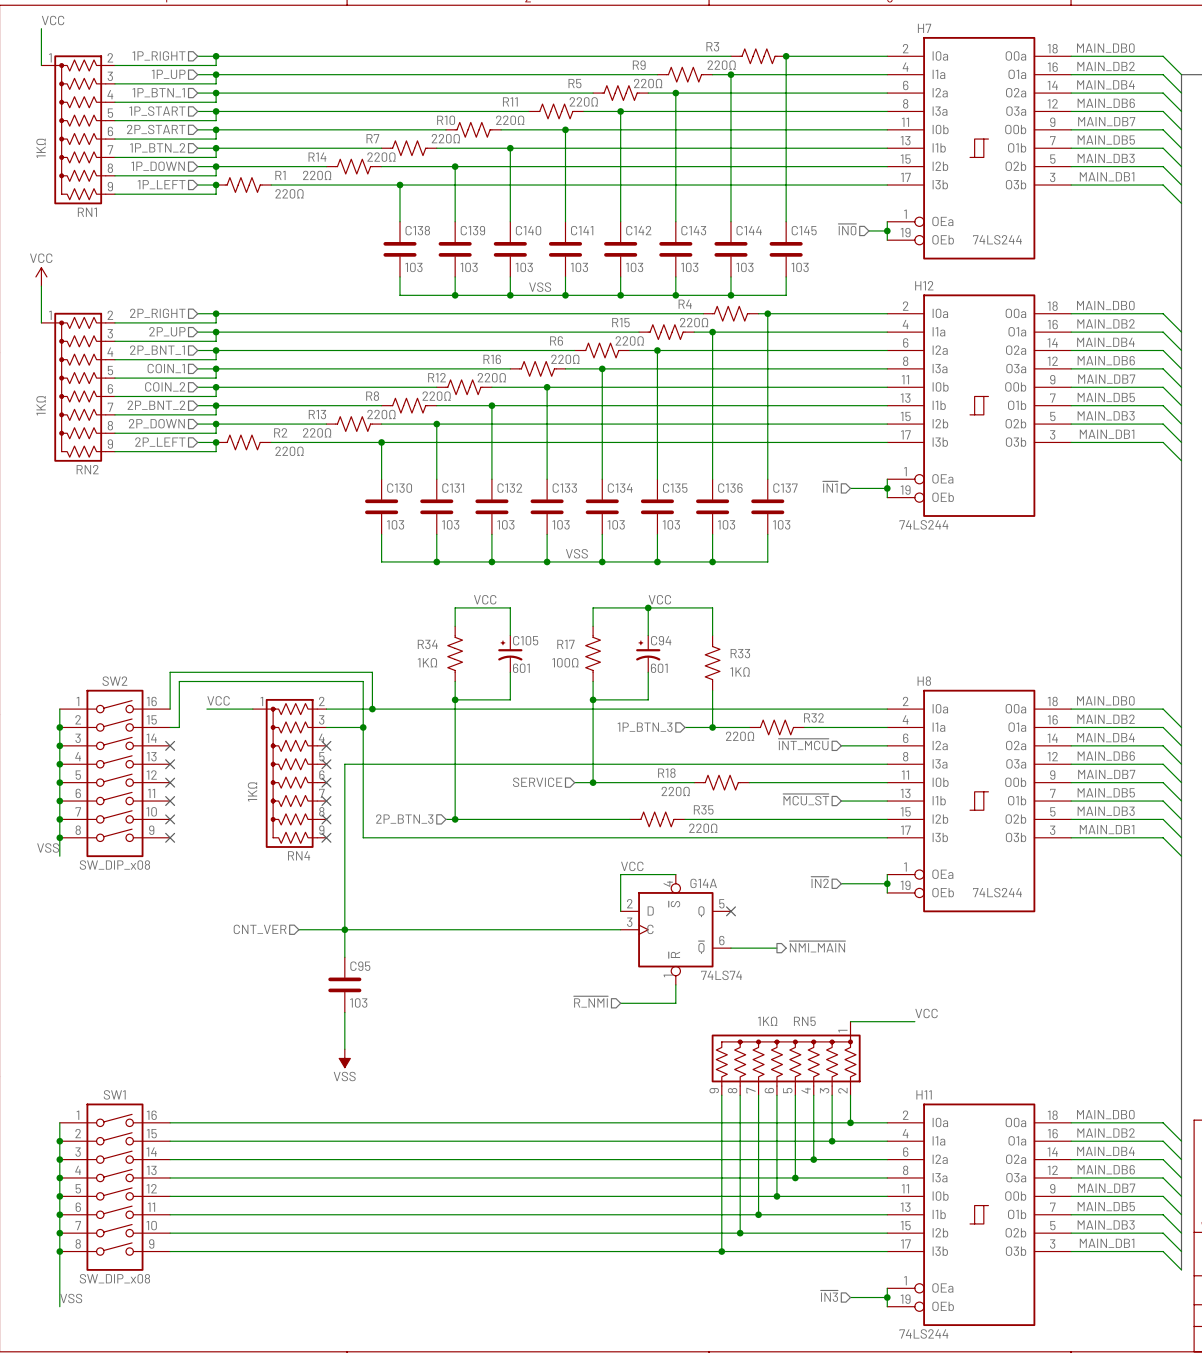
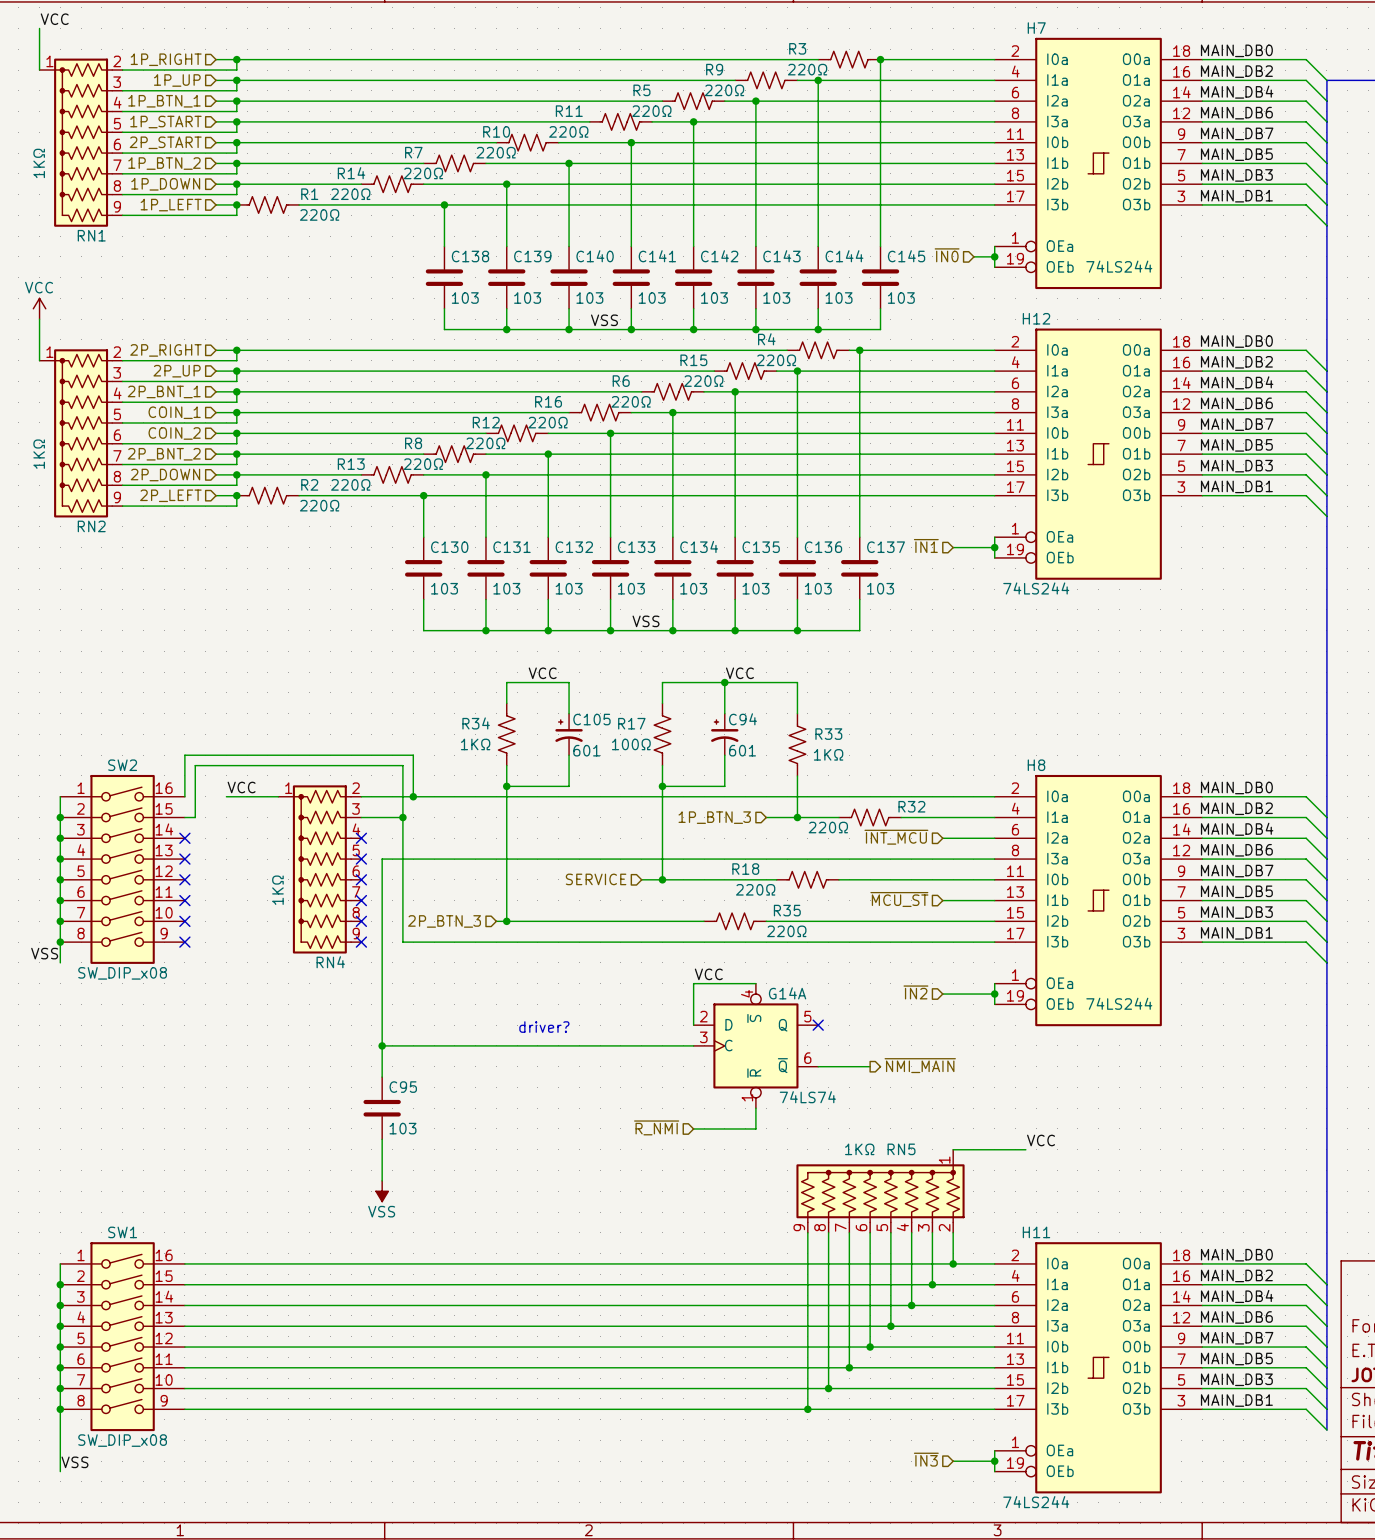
text: none -> driver? (544, 1027)
hierarchical label: CNT_VER (260, 929) -> none
wire: (298, 929) (344, 929) -> none

